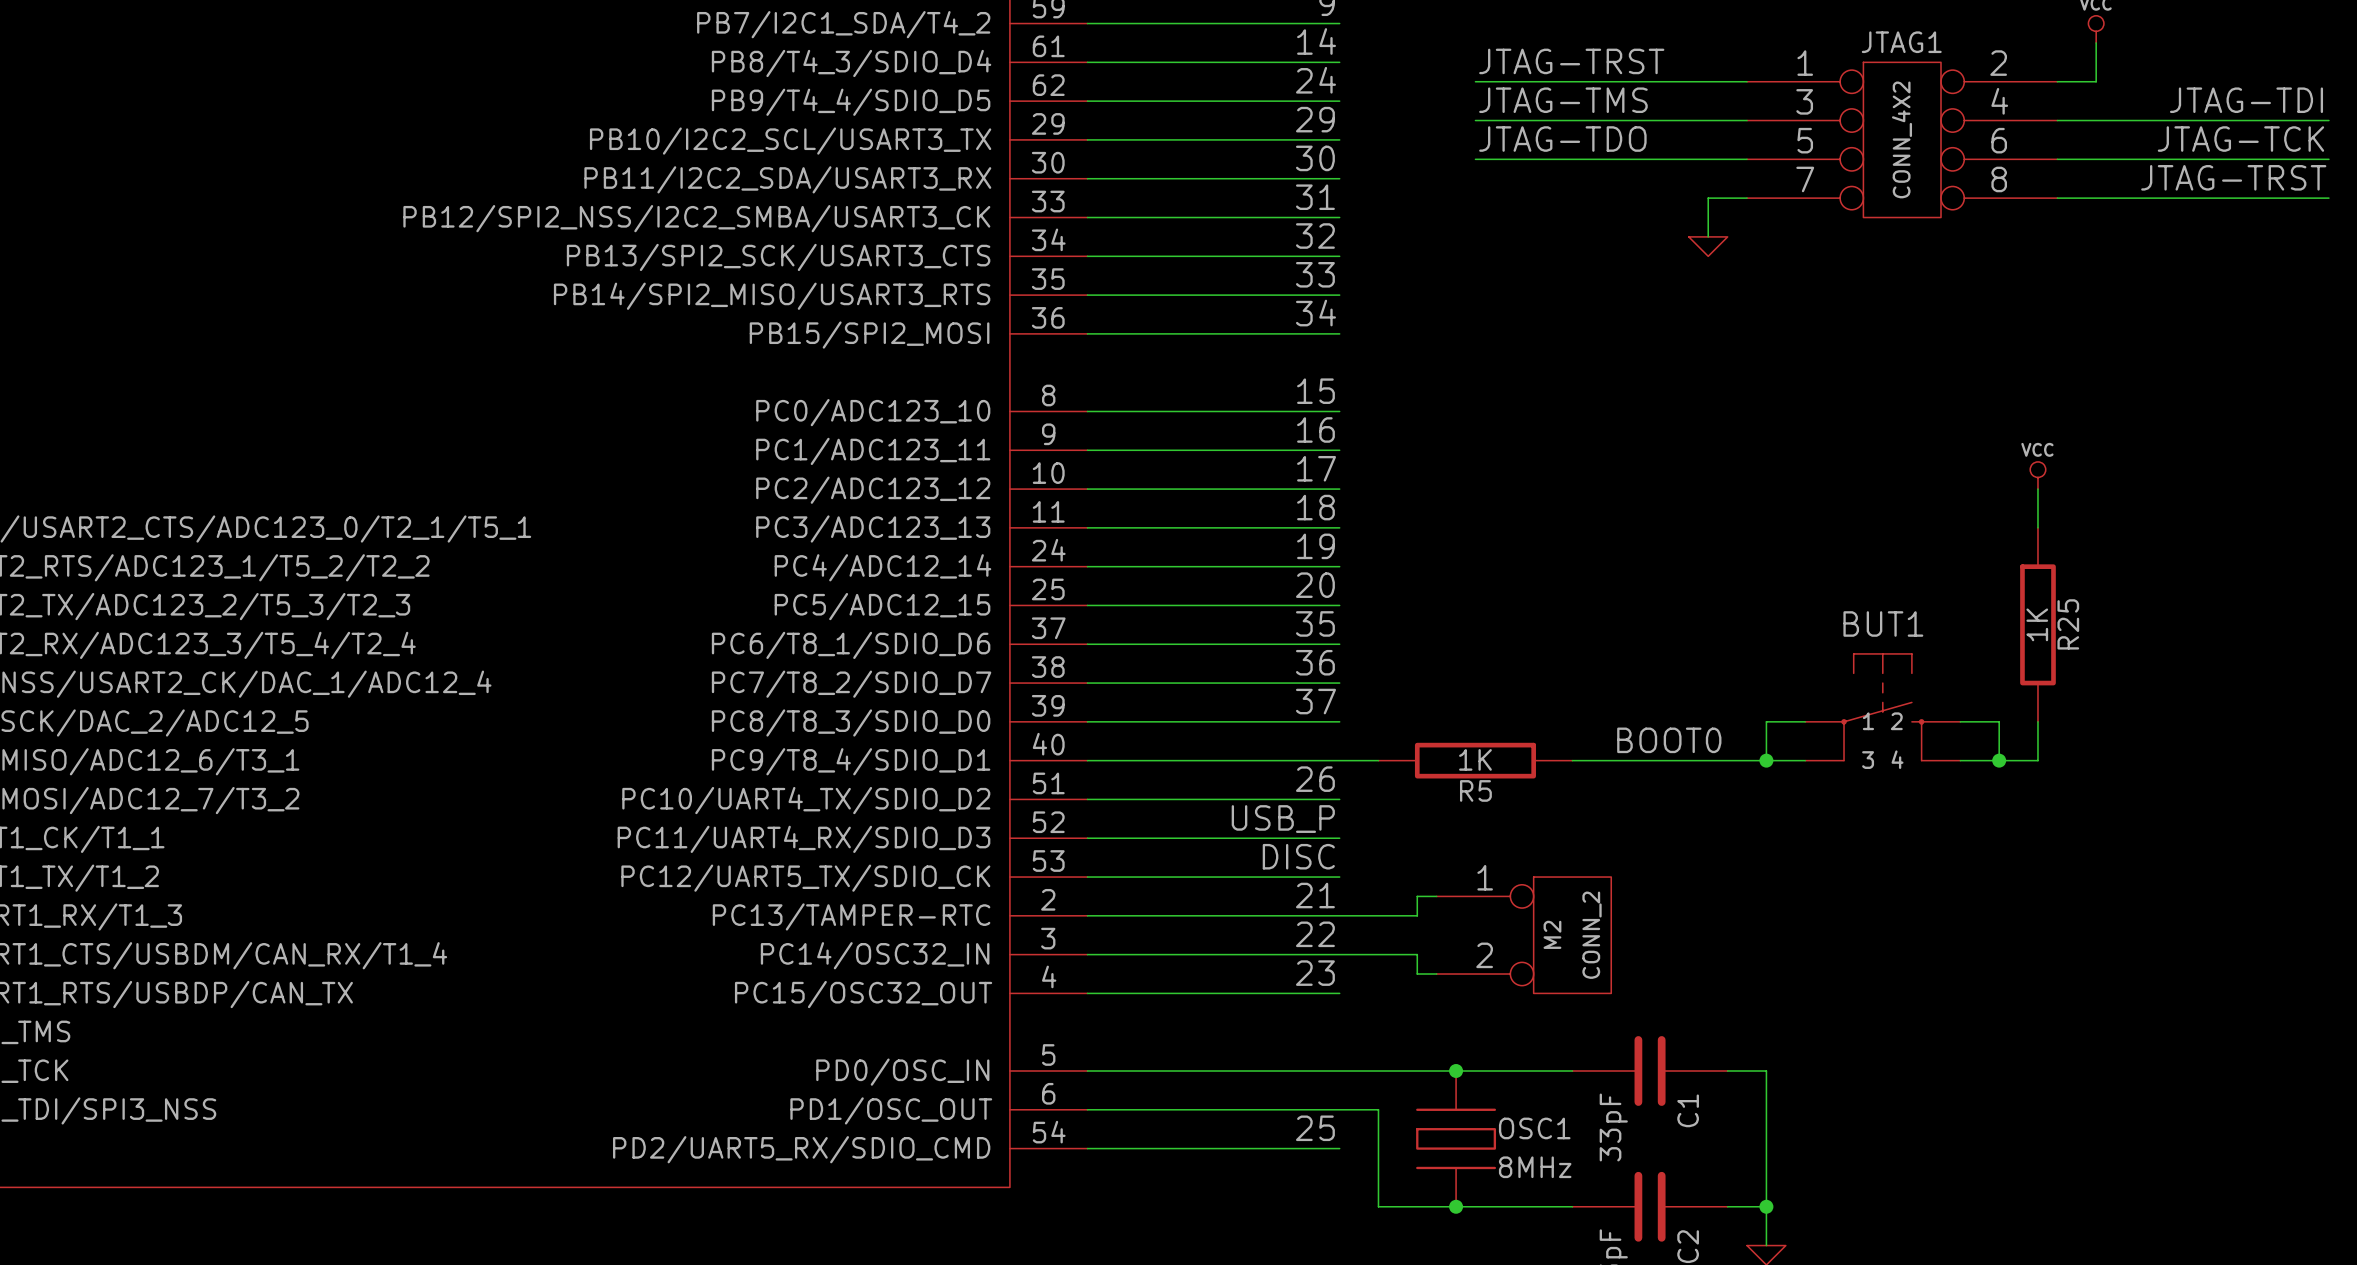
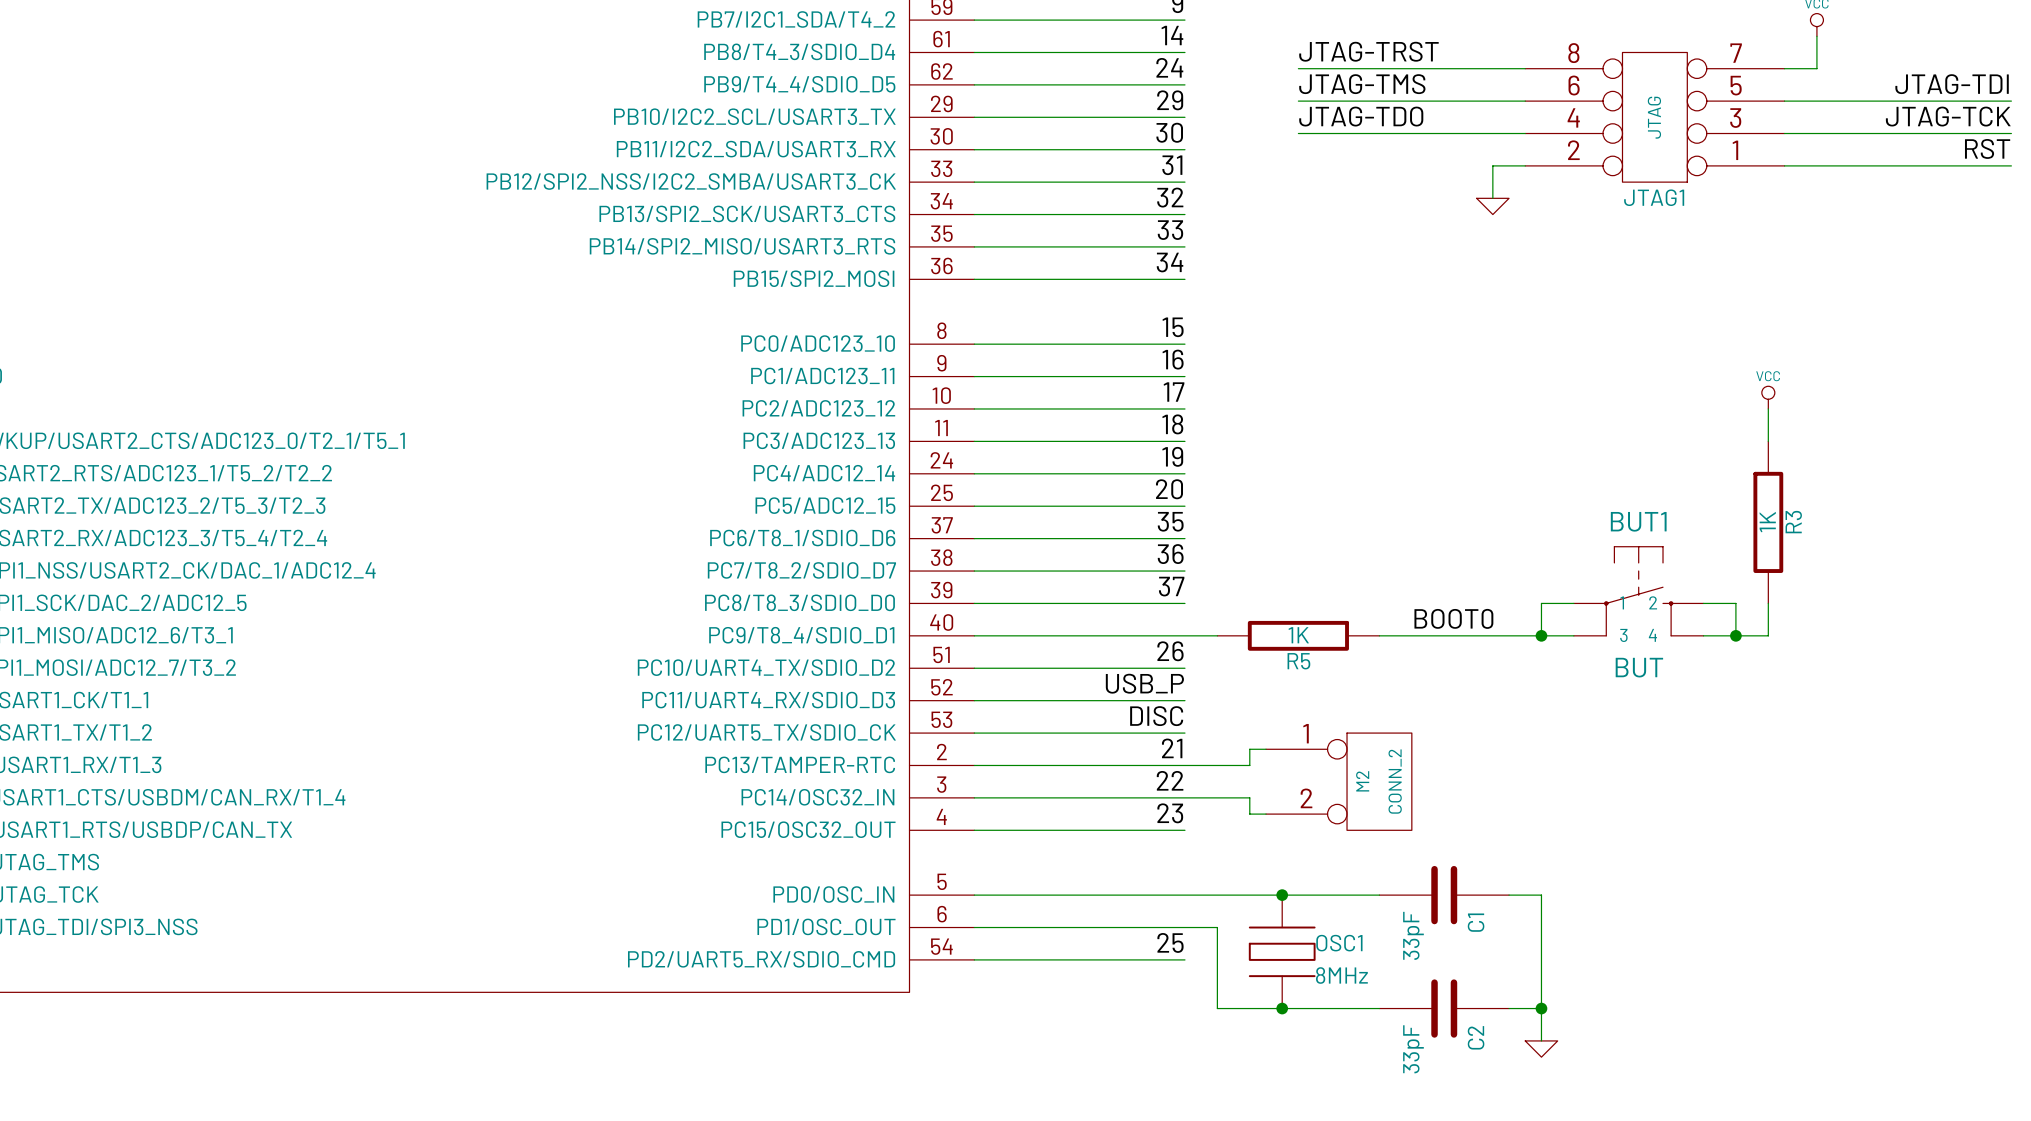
JTAG1 value: CONN_4X2 (1901, 139) -> JTAG (1654, 117)
JTAG1 rotation: 0° (1902, 139) -> 180° (1654, 117)
label: JTAG-TRST (2233, 177) -> RST (1987, 148)
R25 name: R25 (2068, 624) -> R3 (1793, 522)
BUT1 value: none -> BUT (1639, 667)

